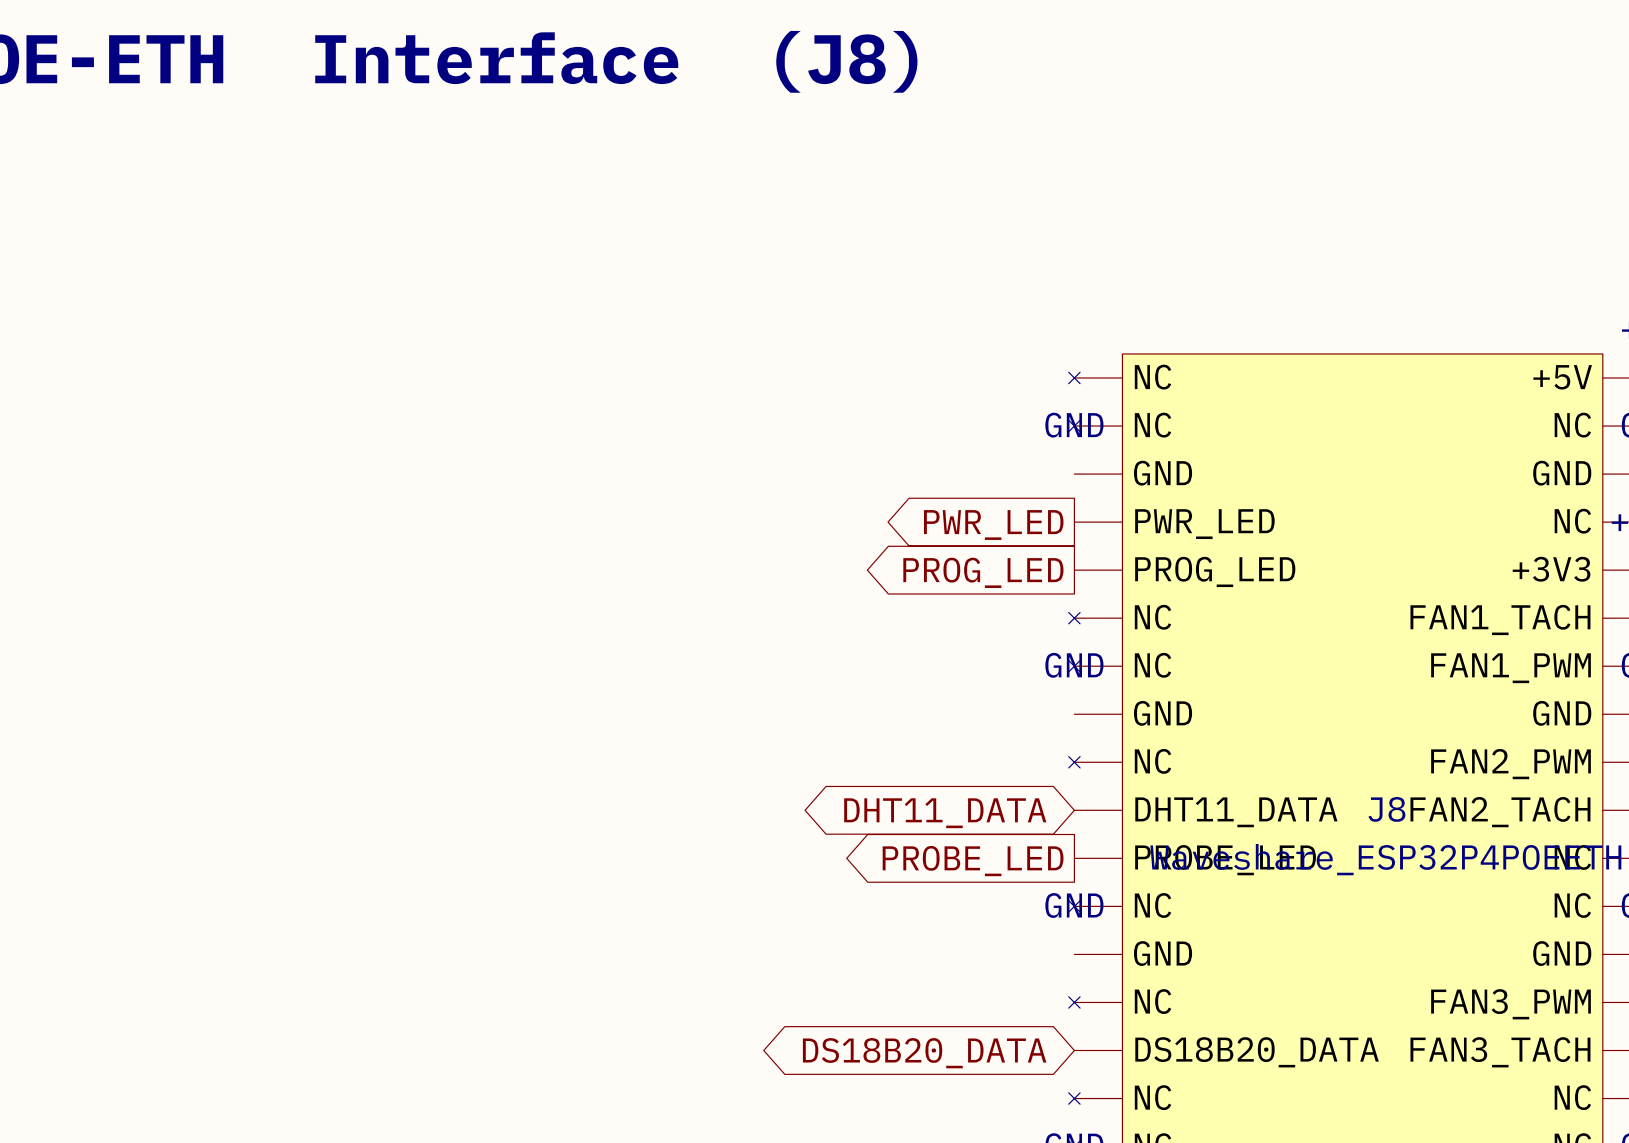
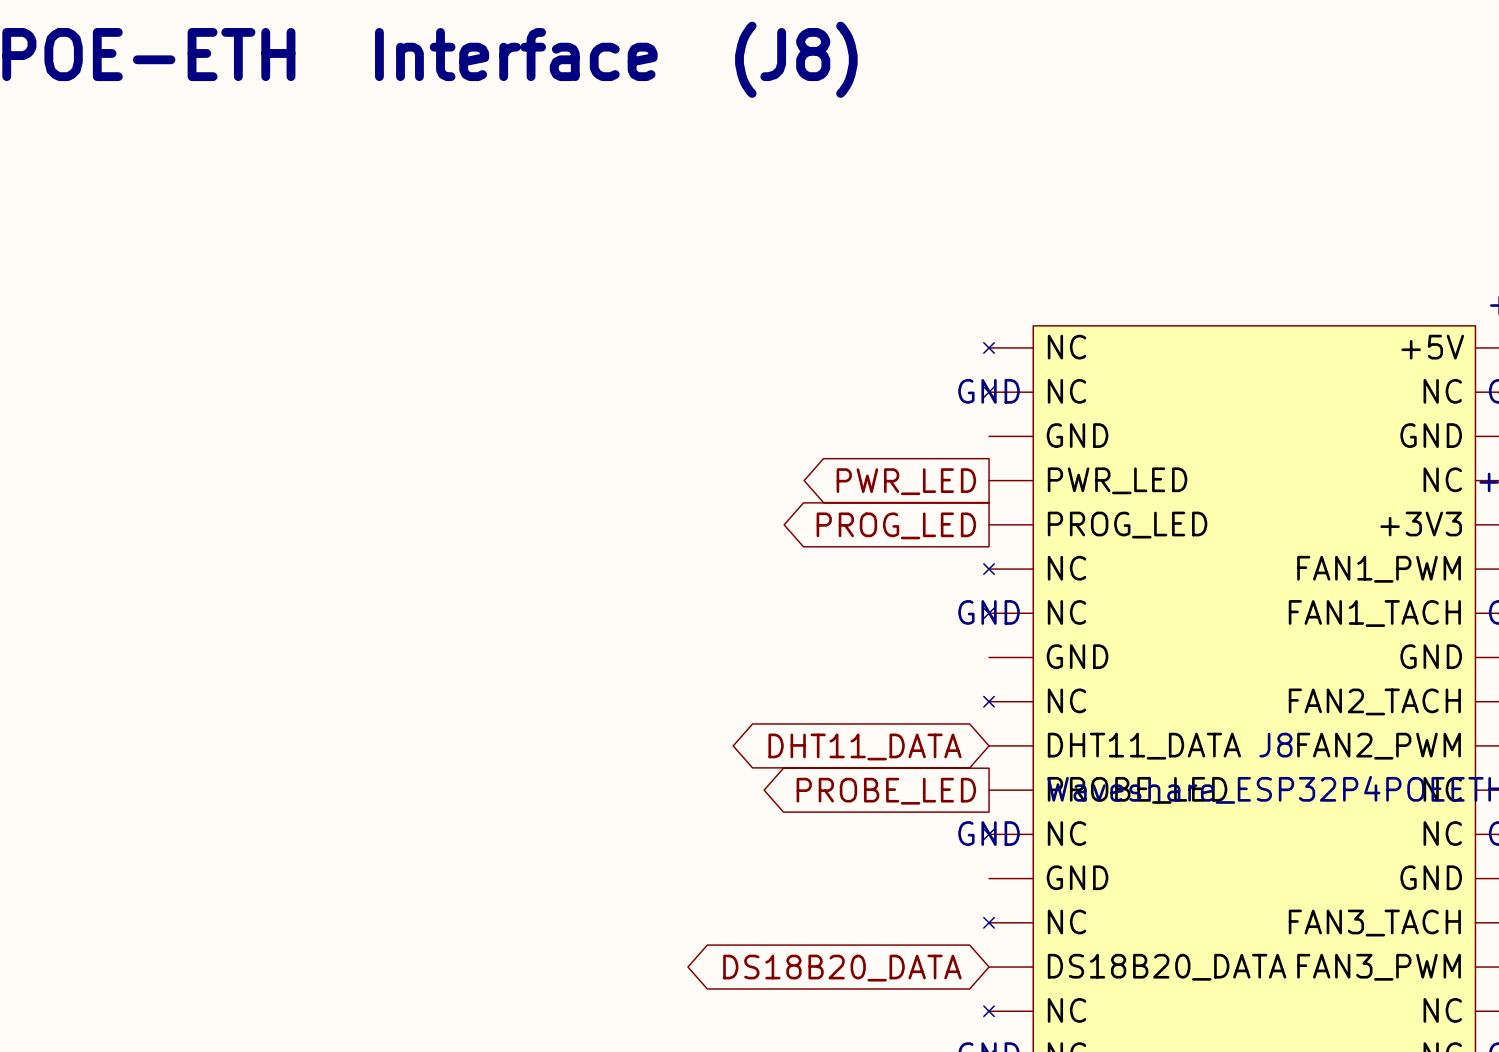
J8 pin name: FAN1_TACH (1500, 619) -> FAN1_PWM (1379, 569)
J8 pin name: FAN1_PWM (1511, 668) -> FAN1_TACH (1374, 613)
J8 pin name: FAN2_PWM (1511, 764) -> FAN2_TACH (1374, 701)
J8 pin name: FAN2_TACH (1500, 812) -> FAN2_PWM (1379, 746)
J8 pin name: FAN3_PWM (1511, 1004) -> FAN3_TACH (1374, 923)
J8 pin name: FAN3_TACH (1500, 1052) -> FAN3_PWM (1379, 967)

